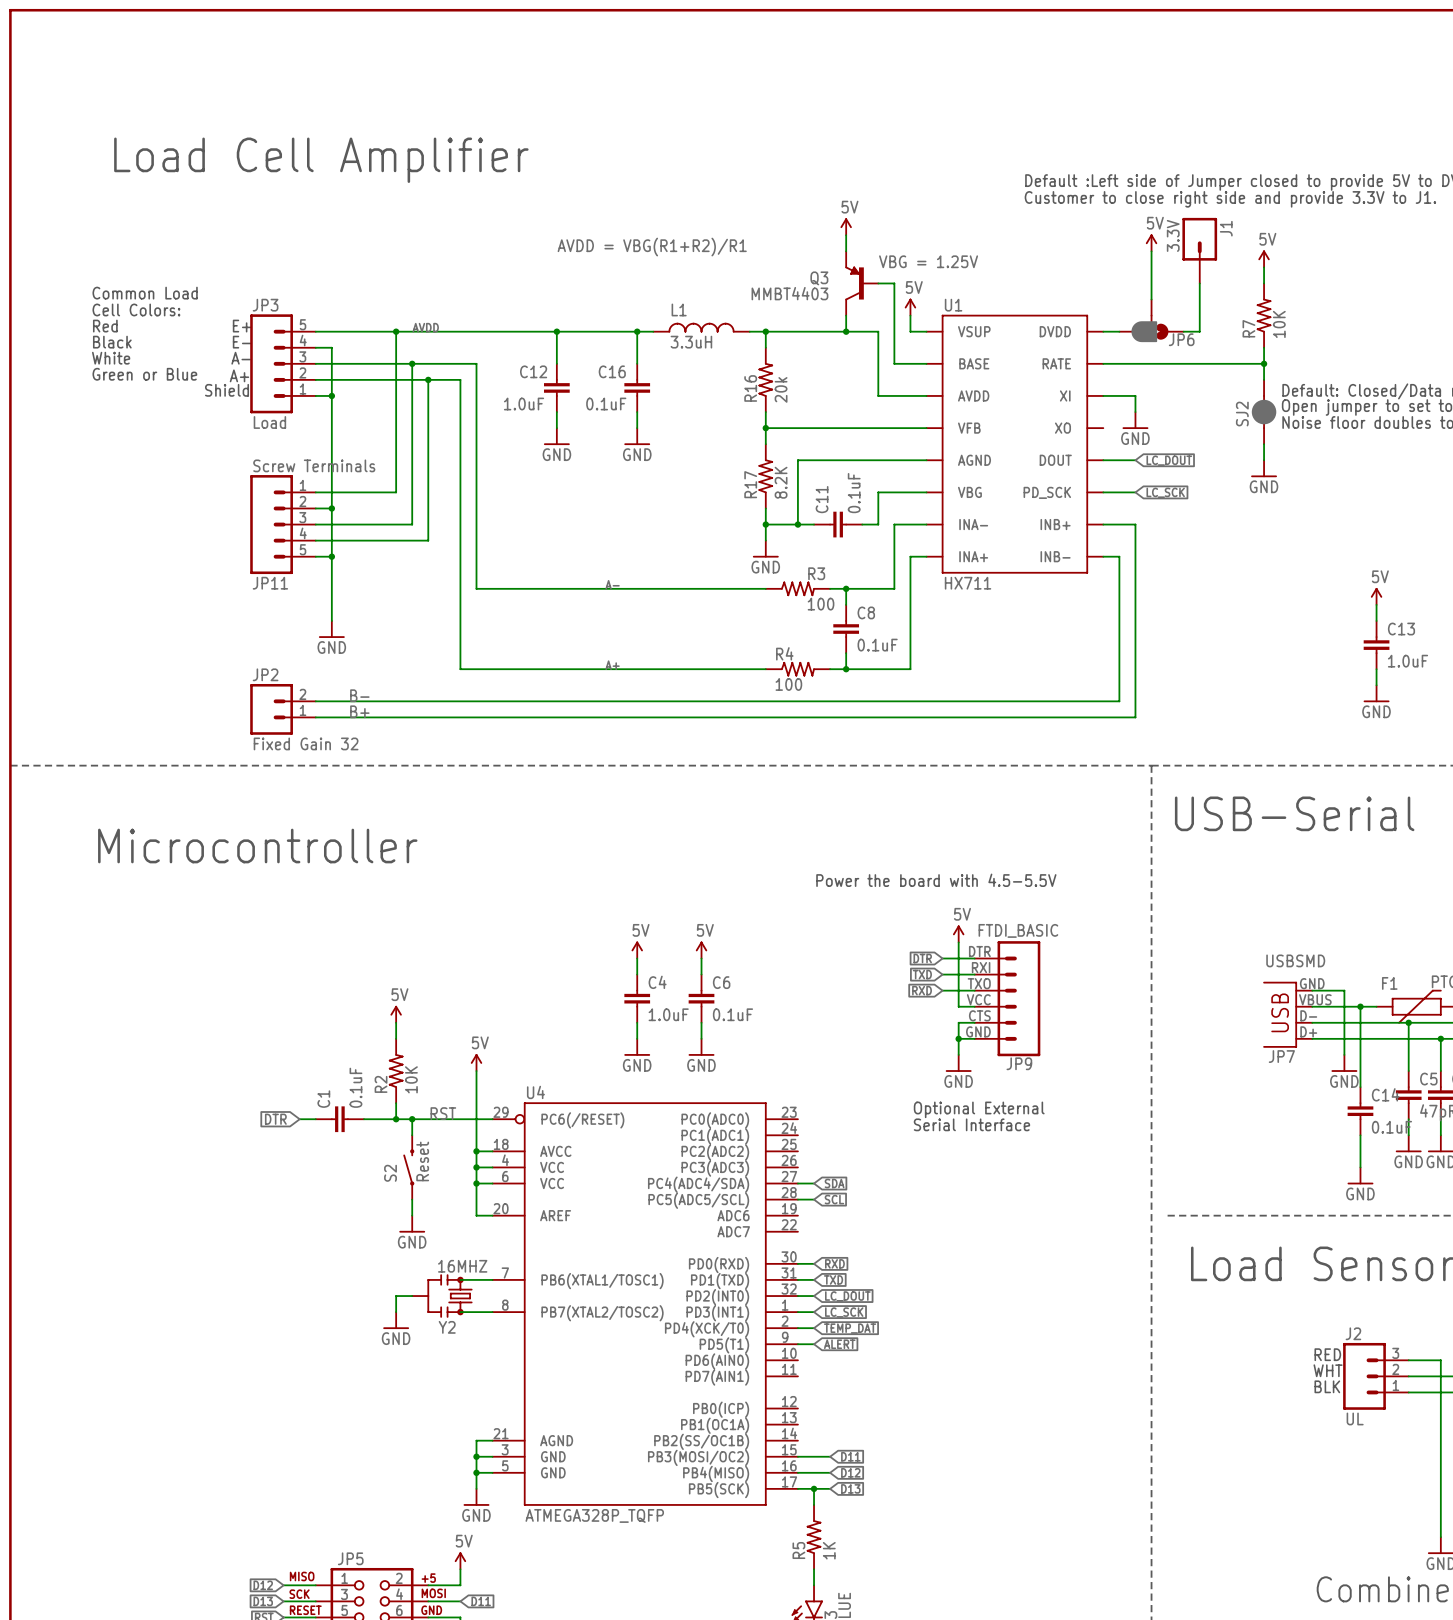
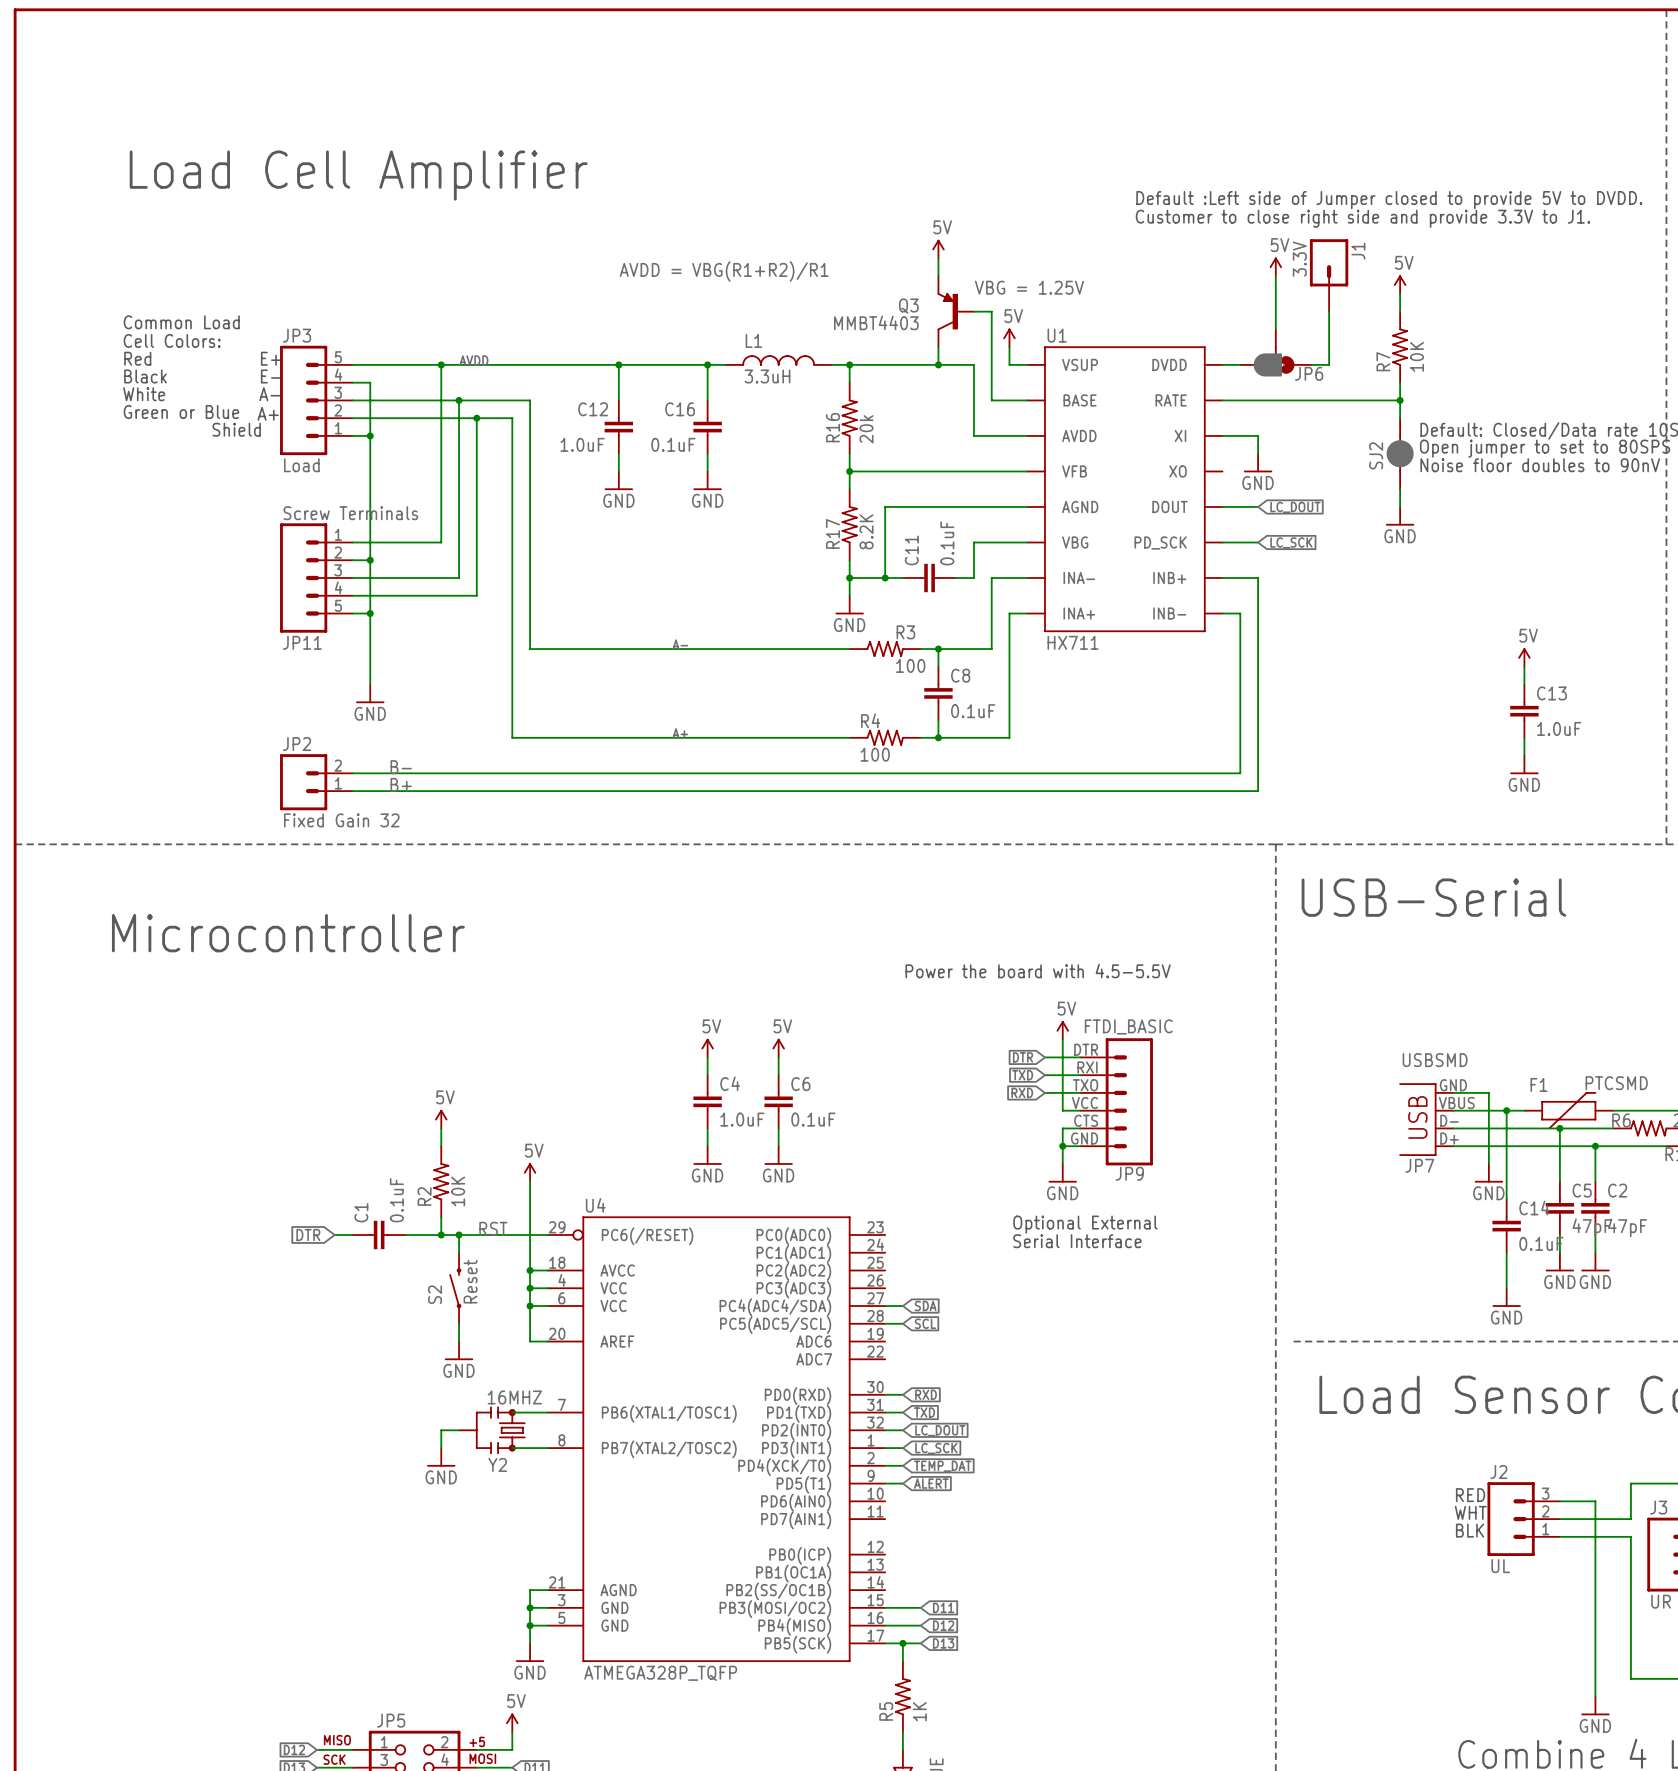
text position: Common Load (145, 293) -> Common Load (181, 322)
text position: Cell Colors: (136, 309) -> Cell Colors: (172, 340)
text position: Red (105, 326) -> Red (137, 358)
text position: Black (112, 342) -> Black (145, 376)
text position: White (111, 358) -> White (144, 394)
text position: Green or Blue (144, 374) -> Green or Blue (181, 411)
text position: Shield (227, 390) -> Shield (236, 429)

